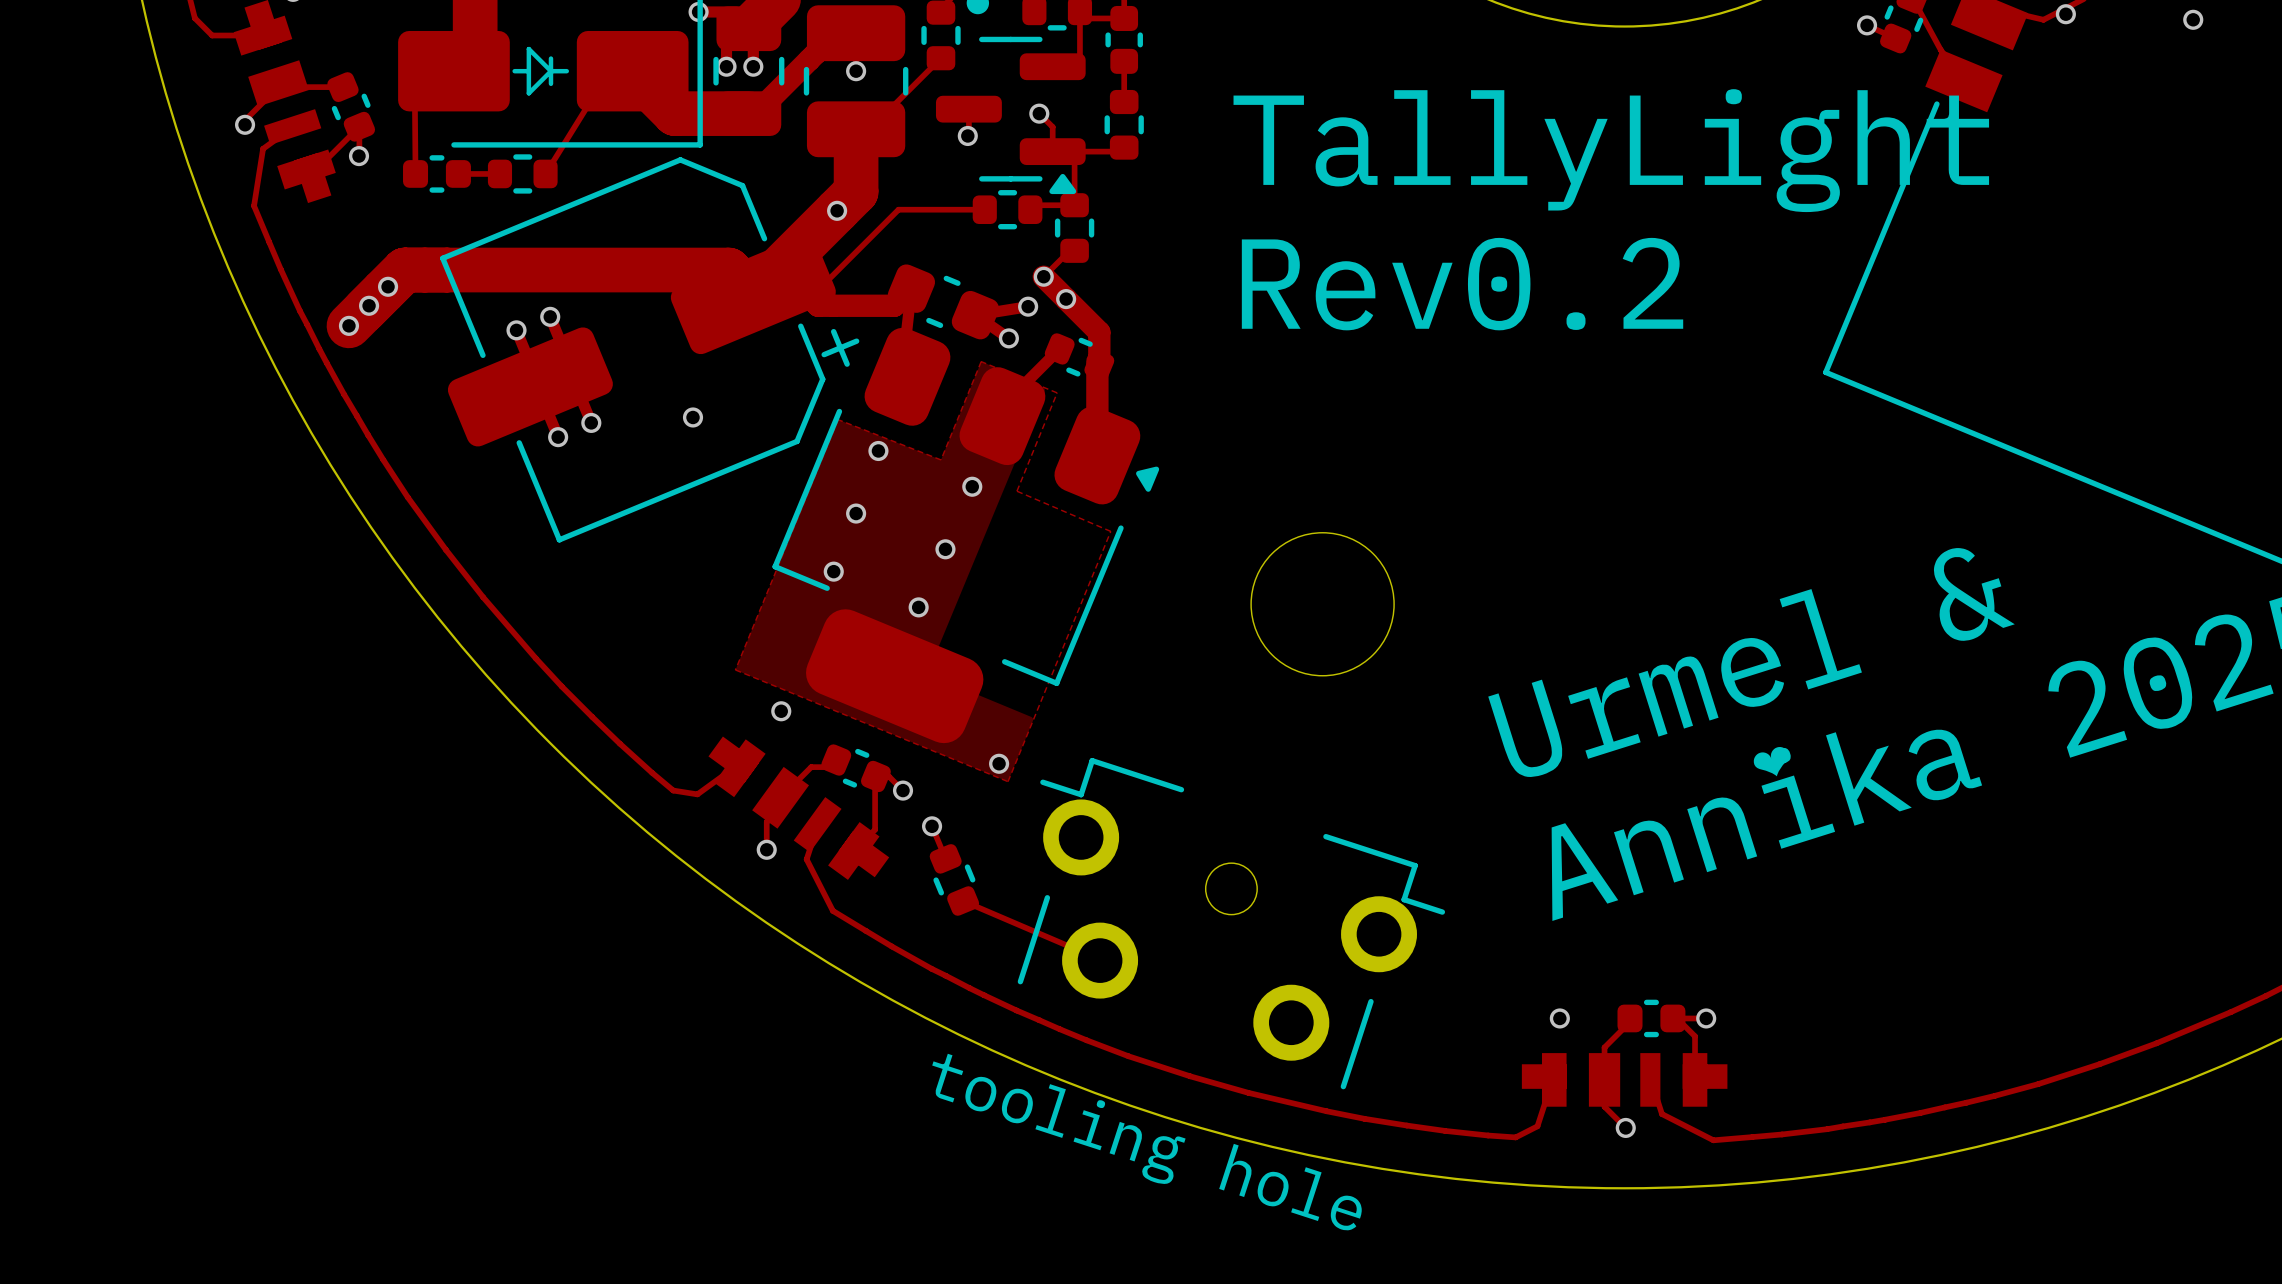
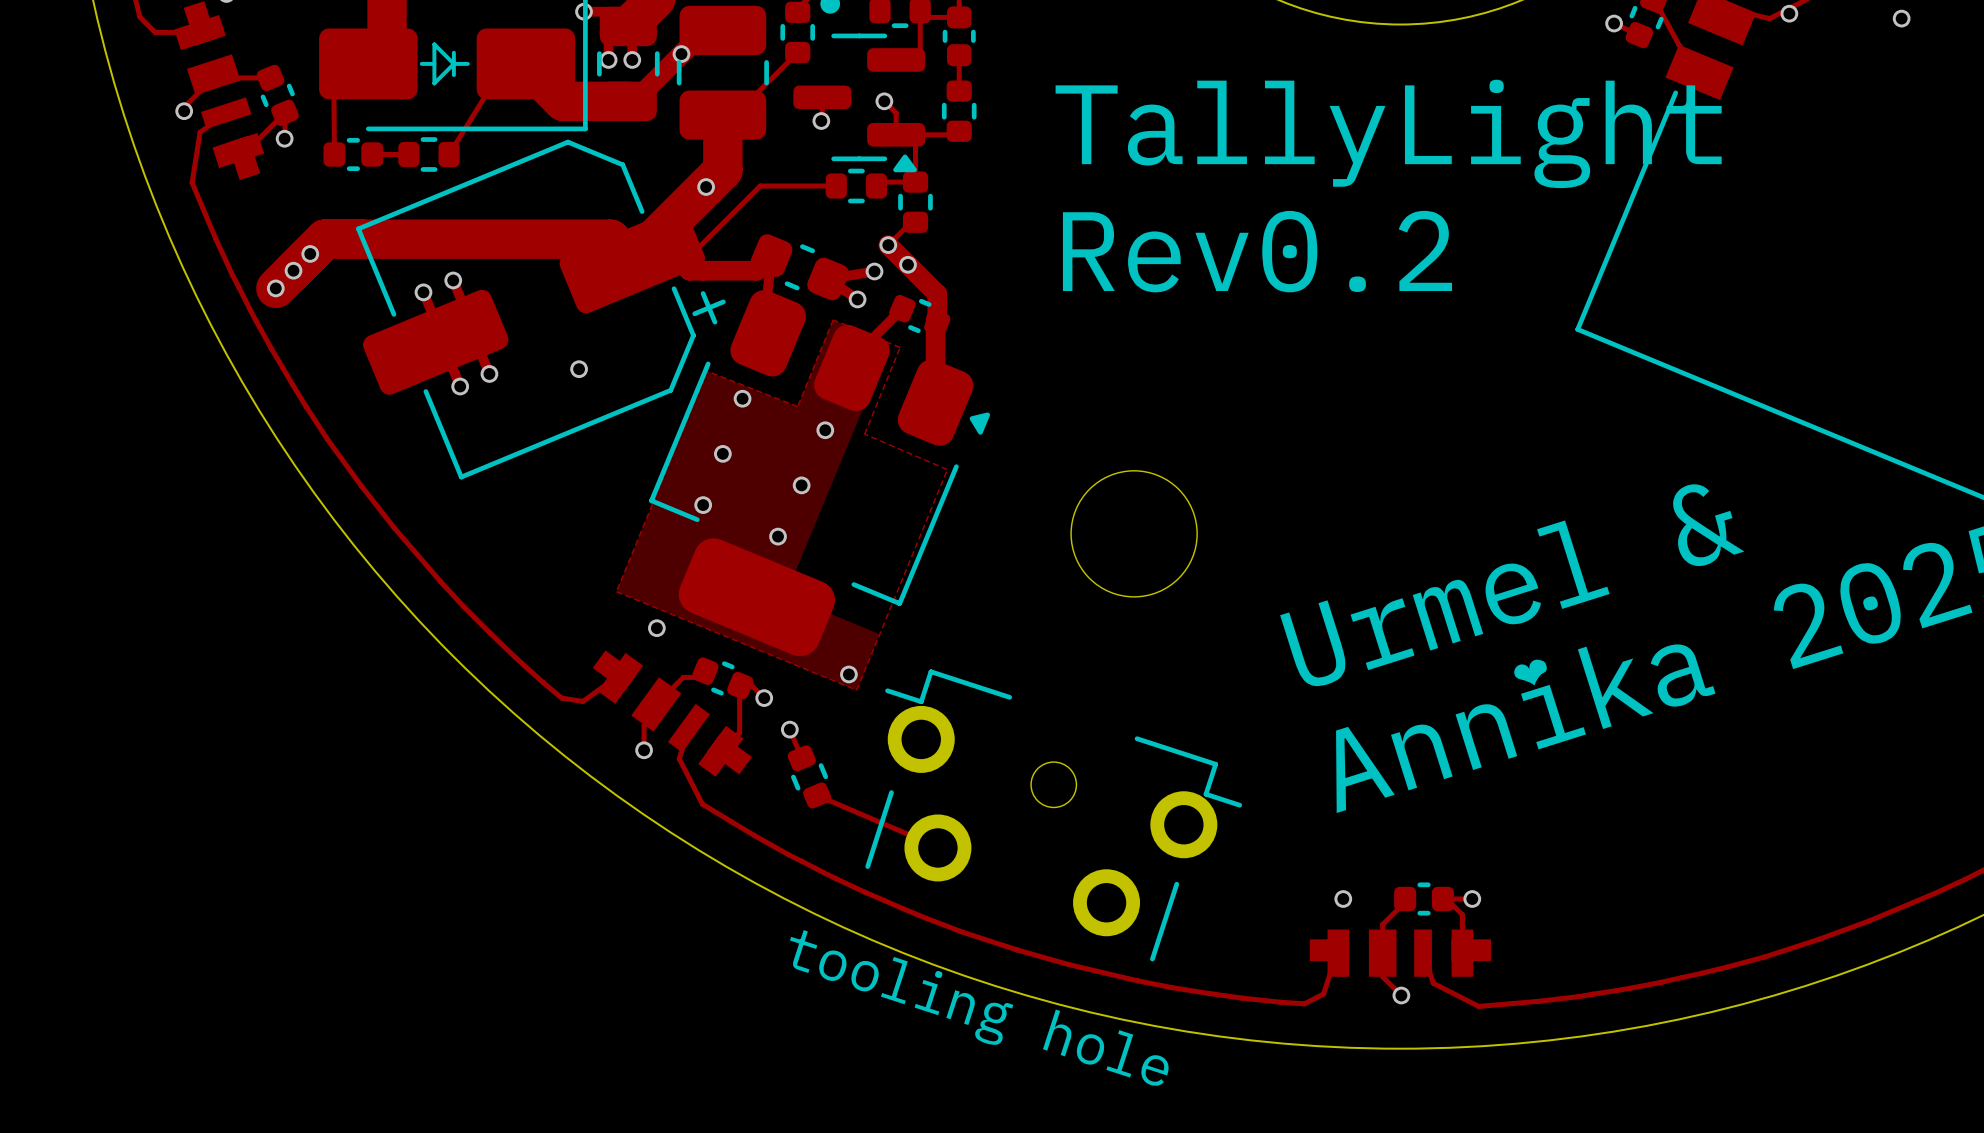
via position: (856, 71) -> (681, 54)

